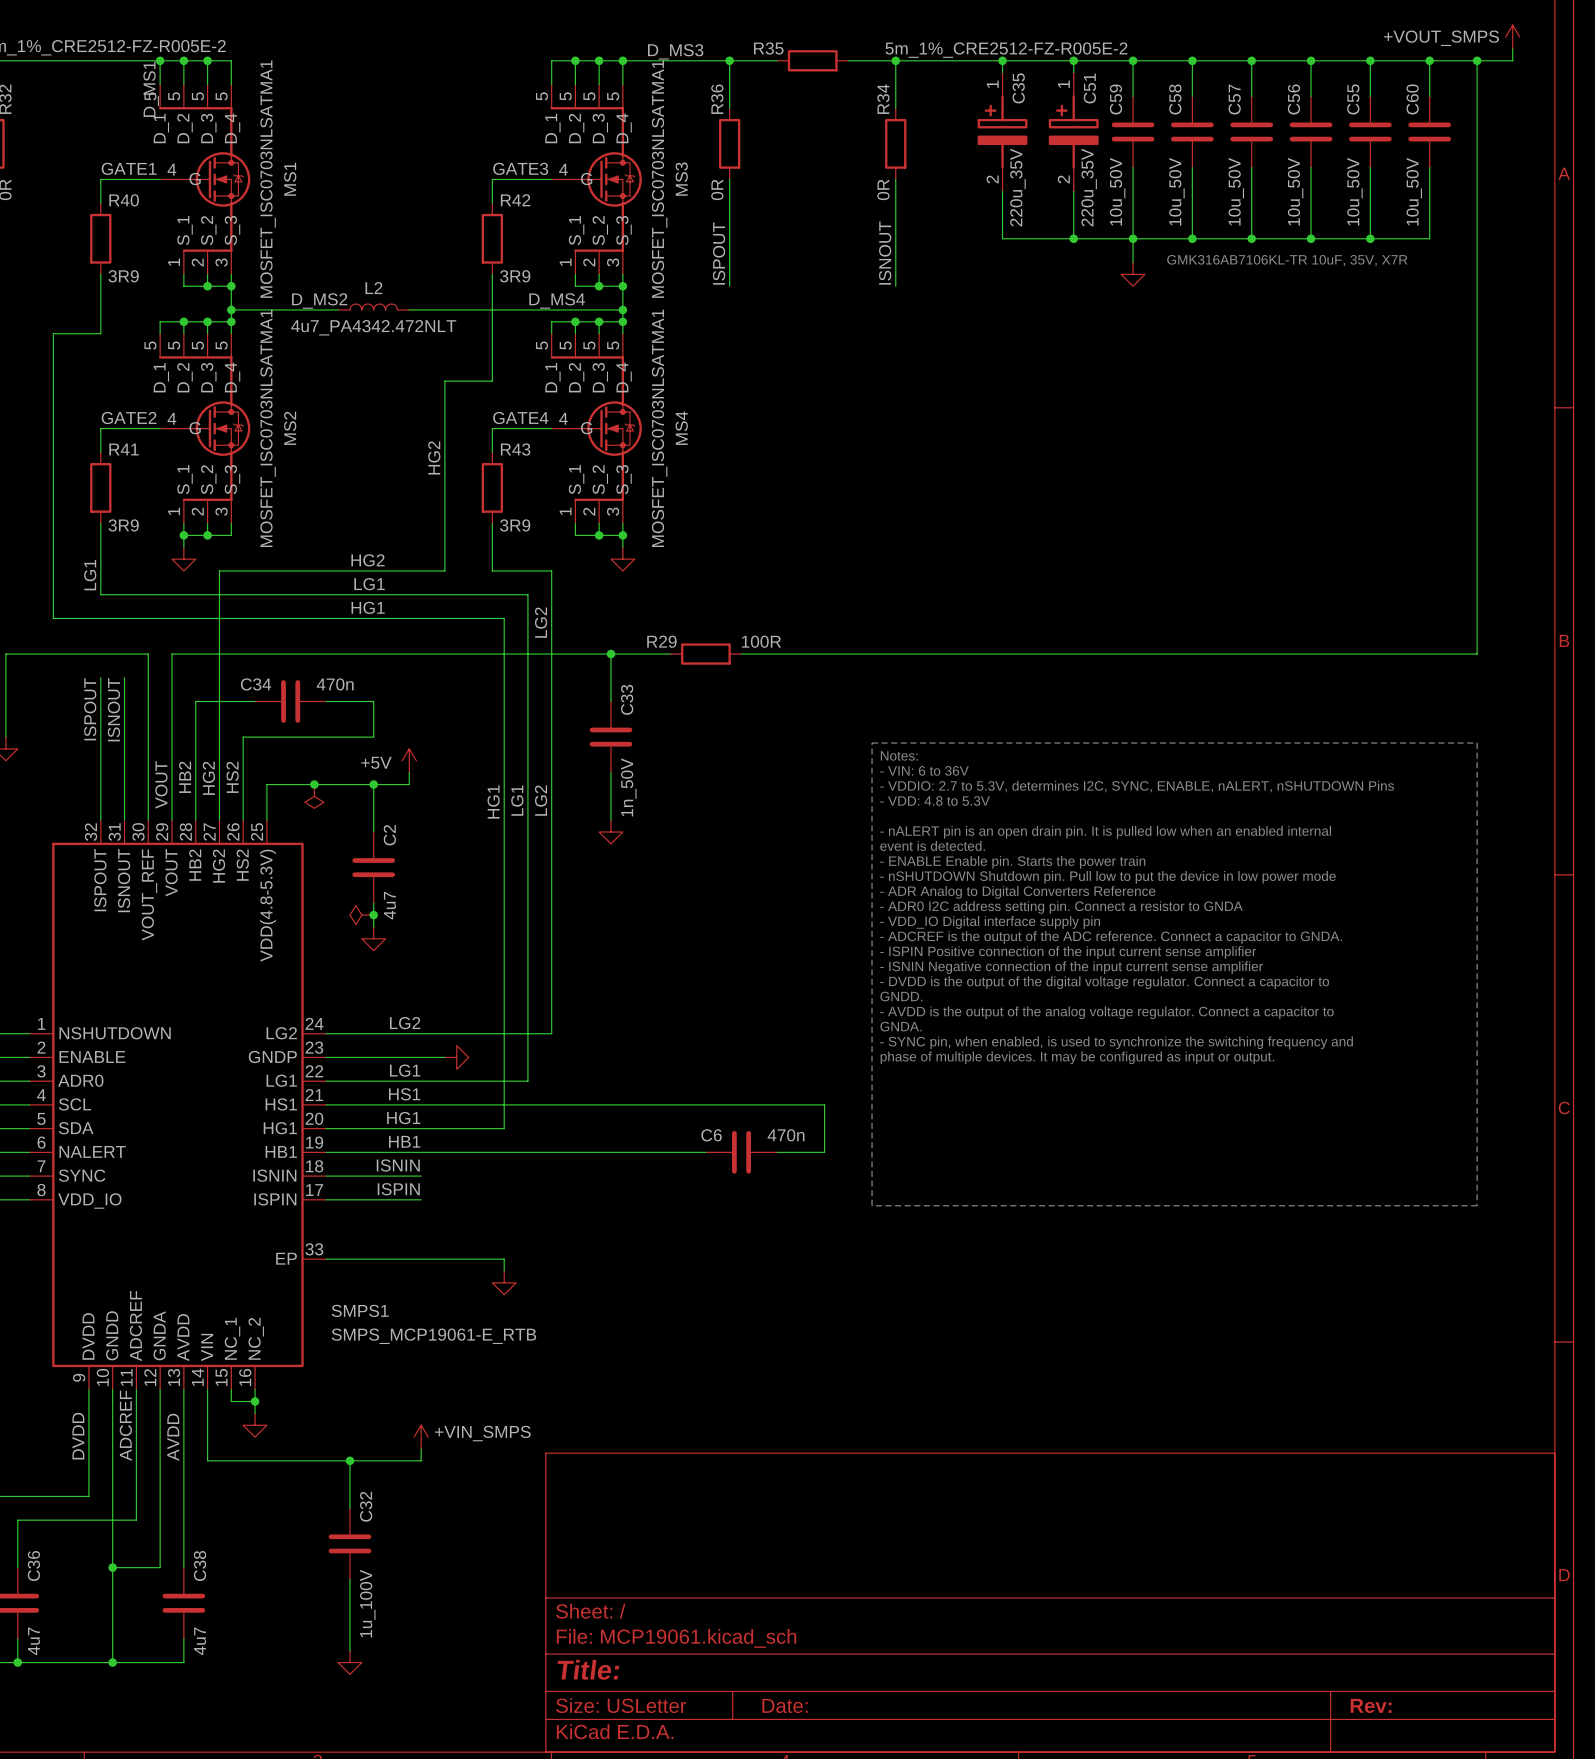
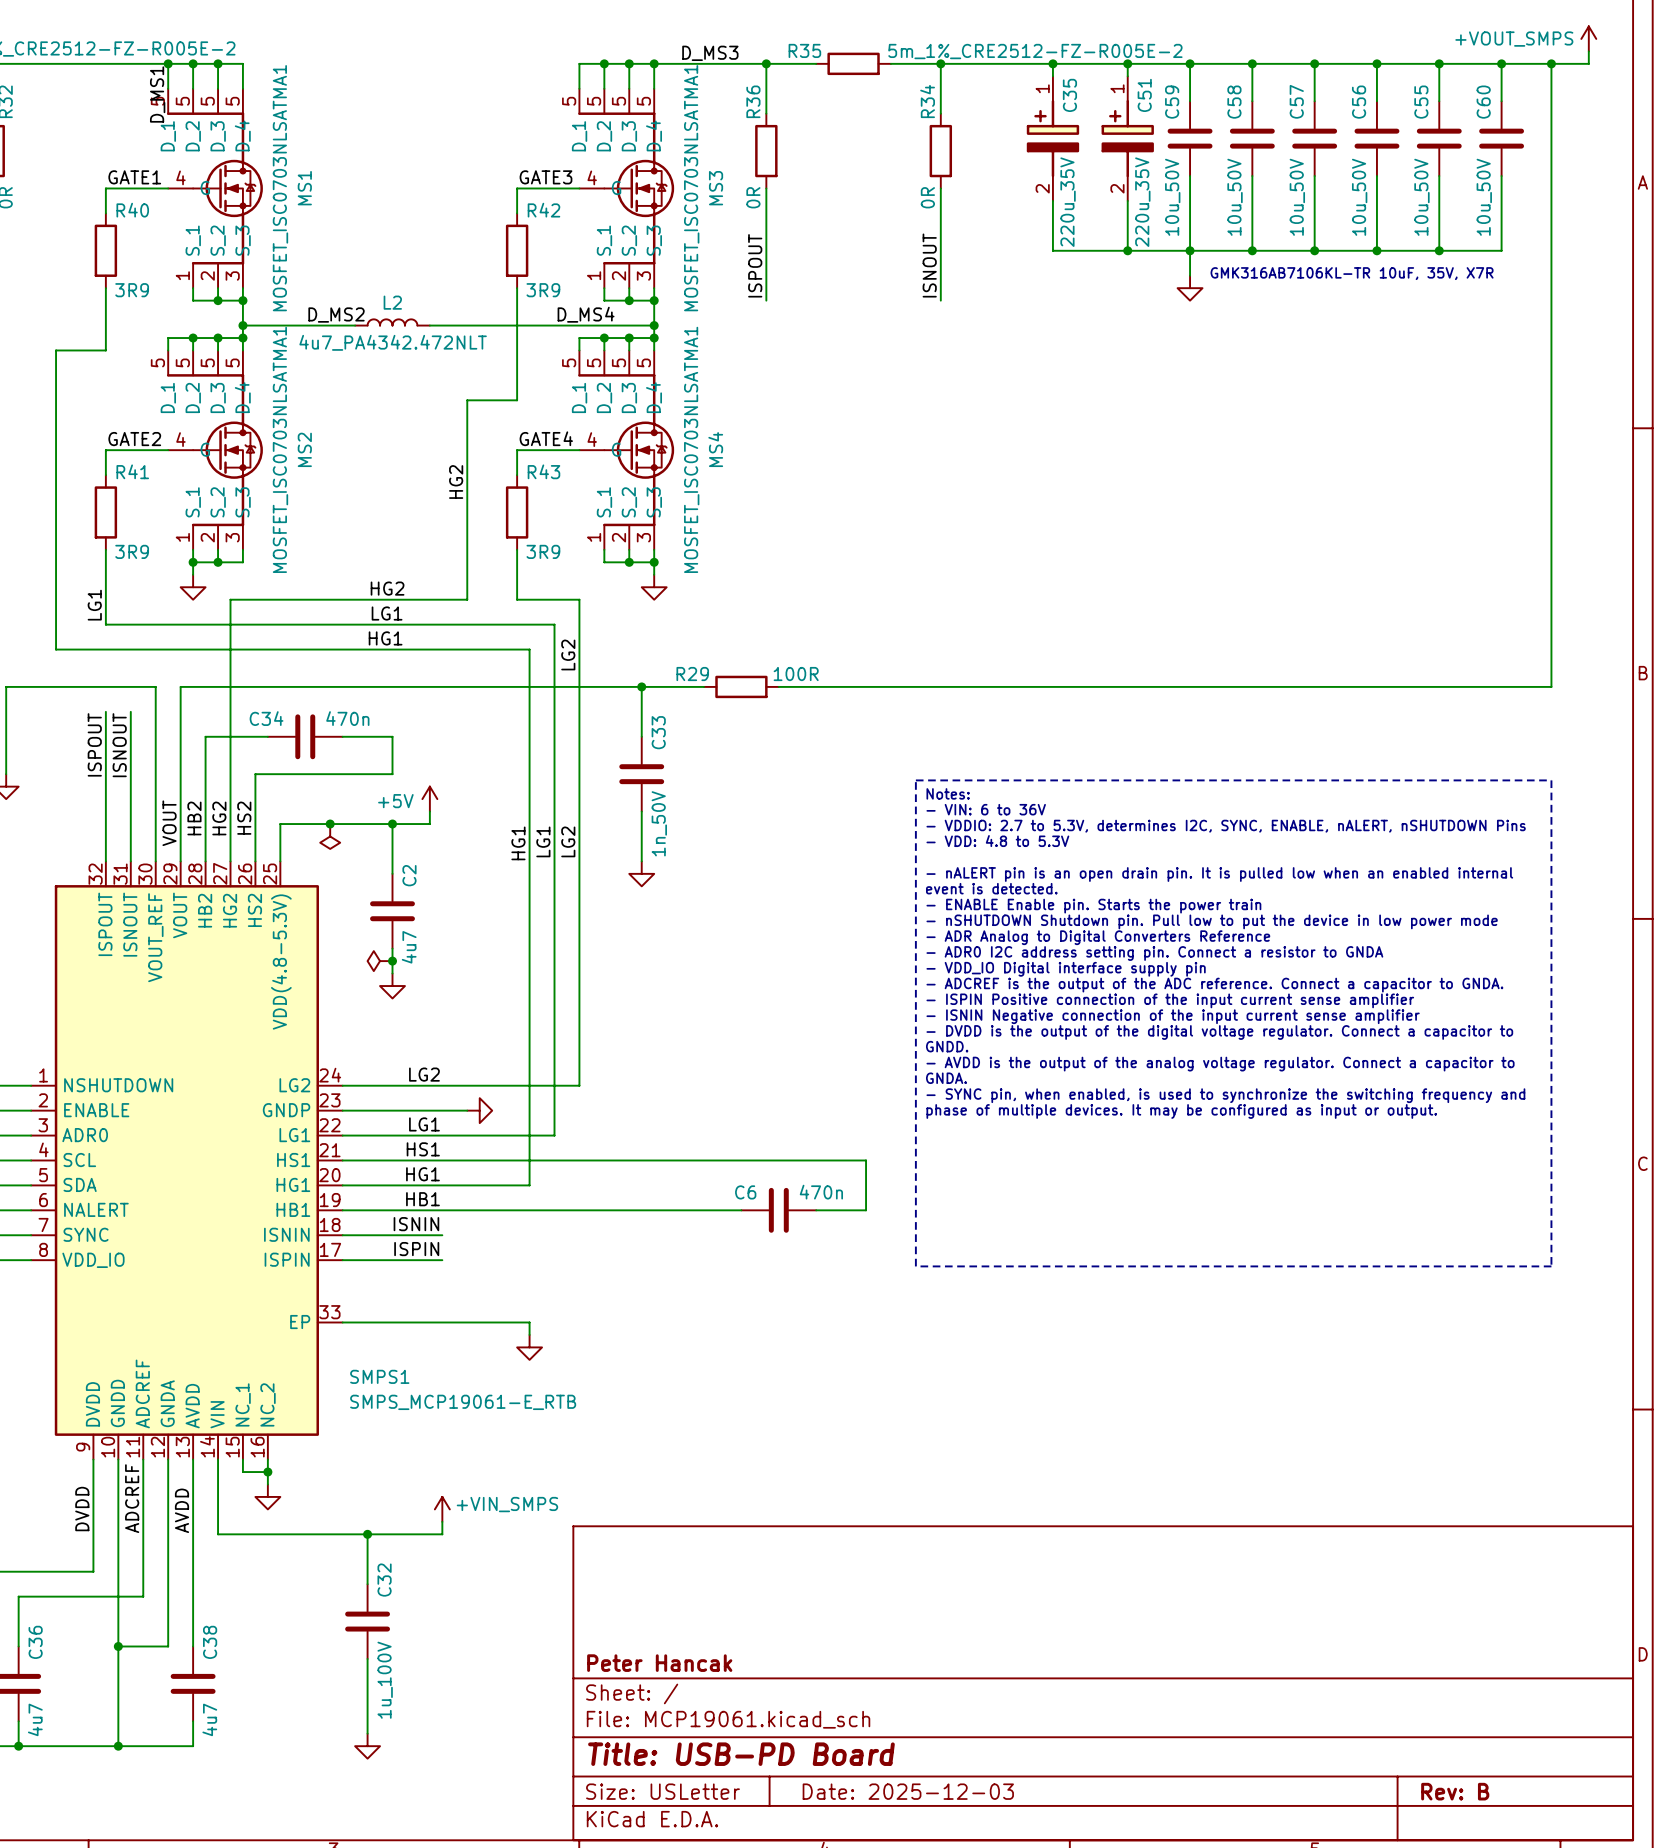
title block: none -> Peter Hancak (659, 1663)
title block: Title: (588, 1669) -> Title: USB-PD Board (741, 1754)
title block: Date: (785, 1705) -> Date: 2025-12-03 (908, 1791)
title block: Rev: (1371, 1705) -> Rev: B (1455, 1791)

